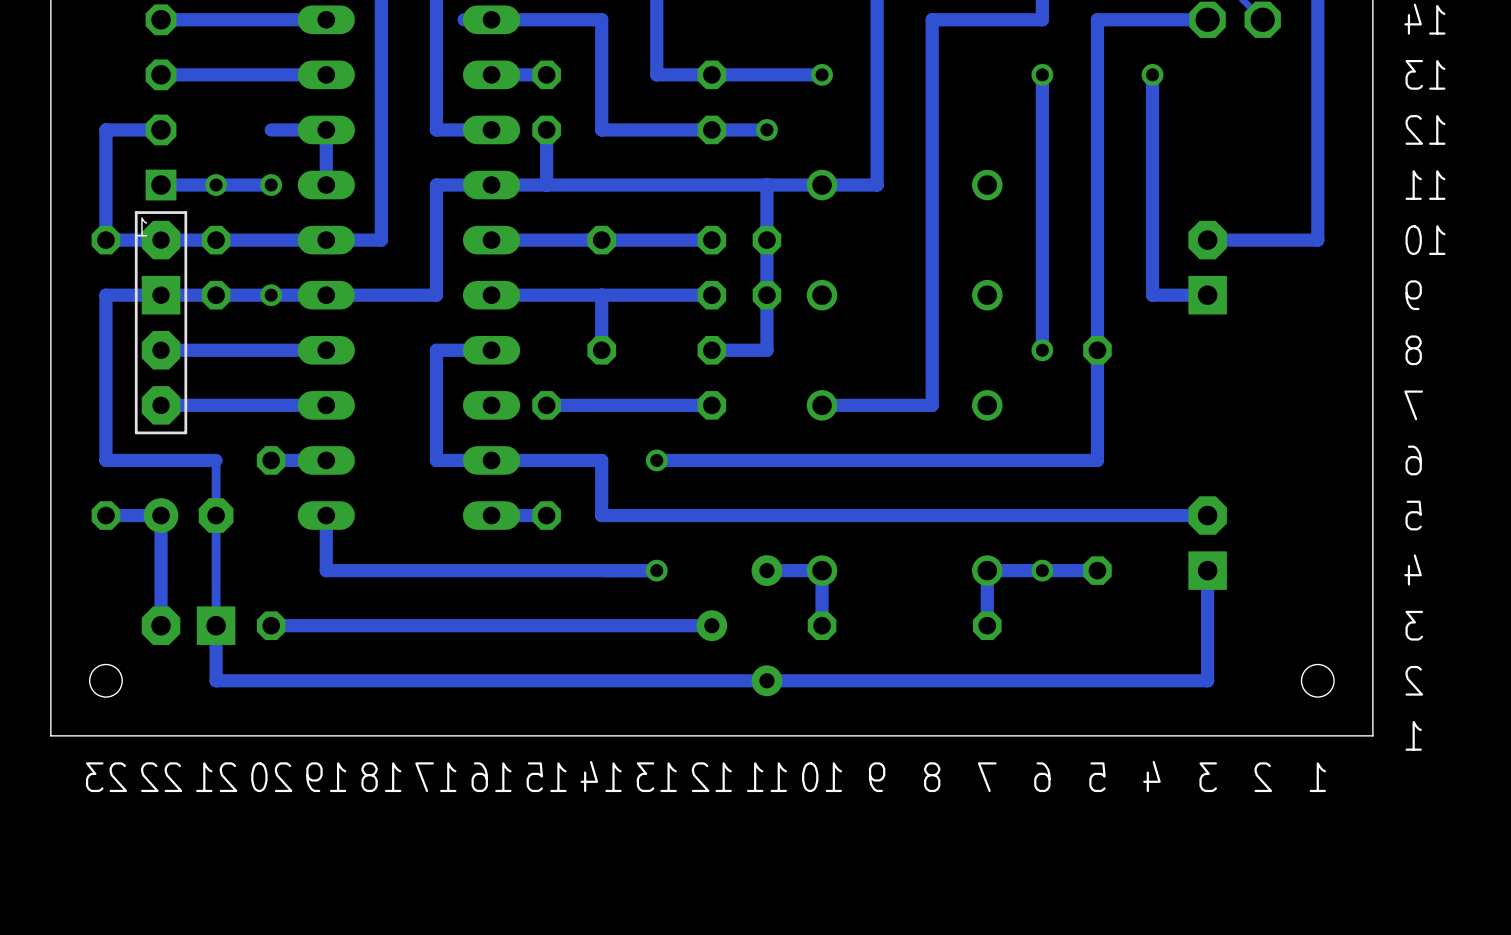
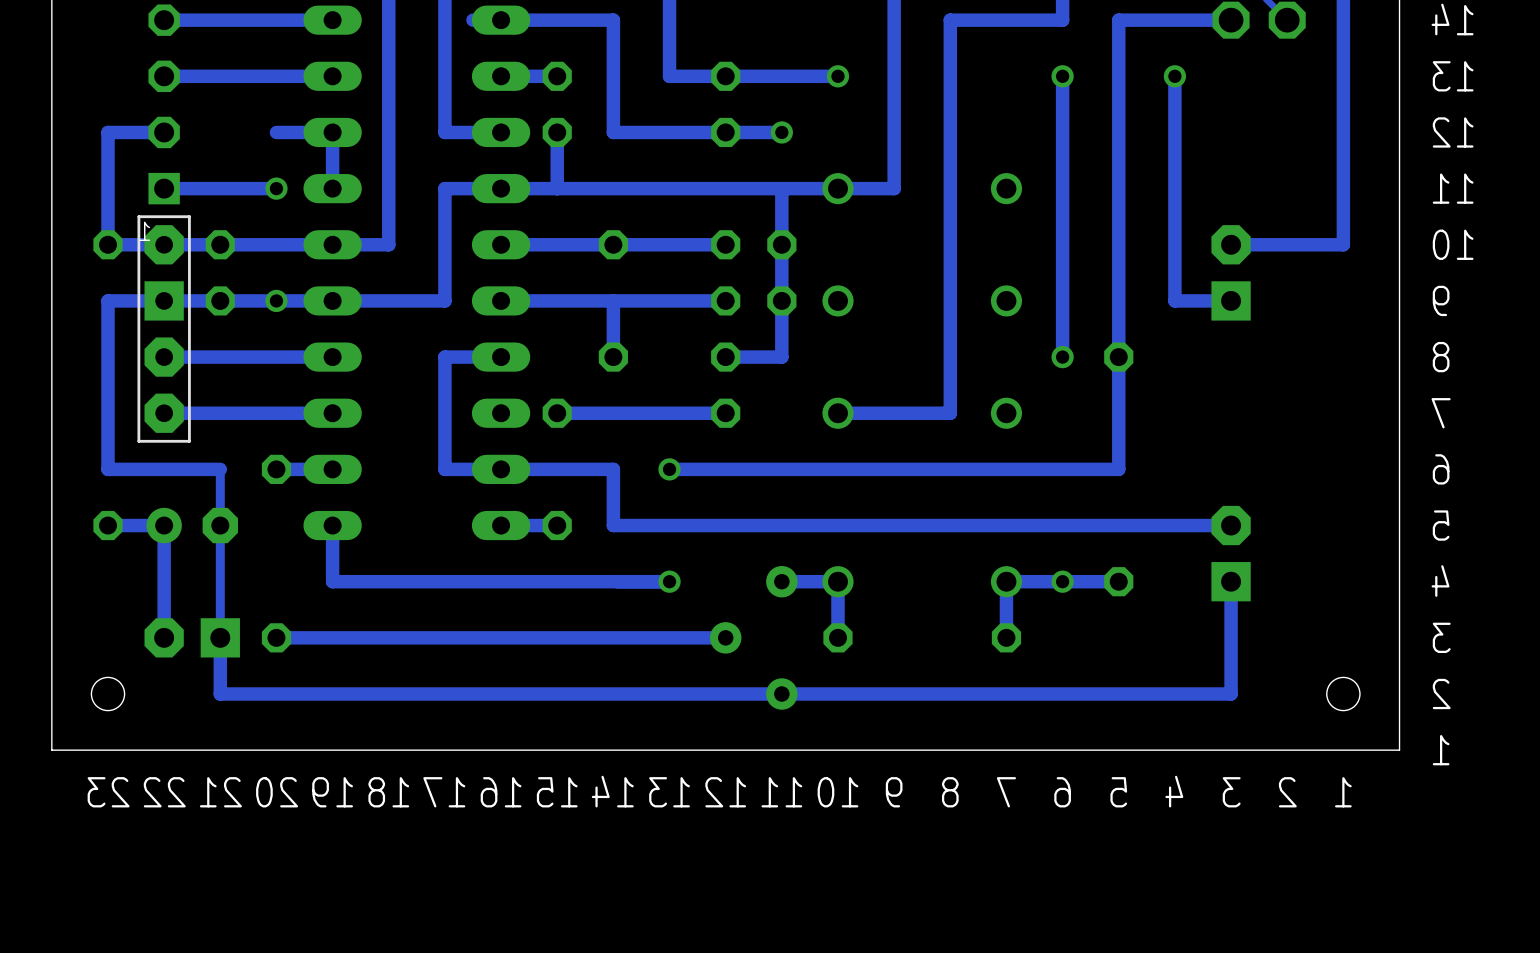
via: (216, 185) -> none

